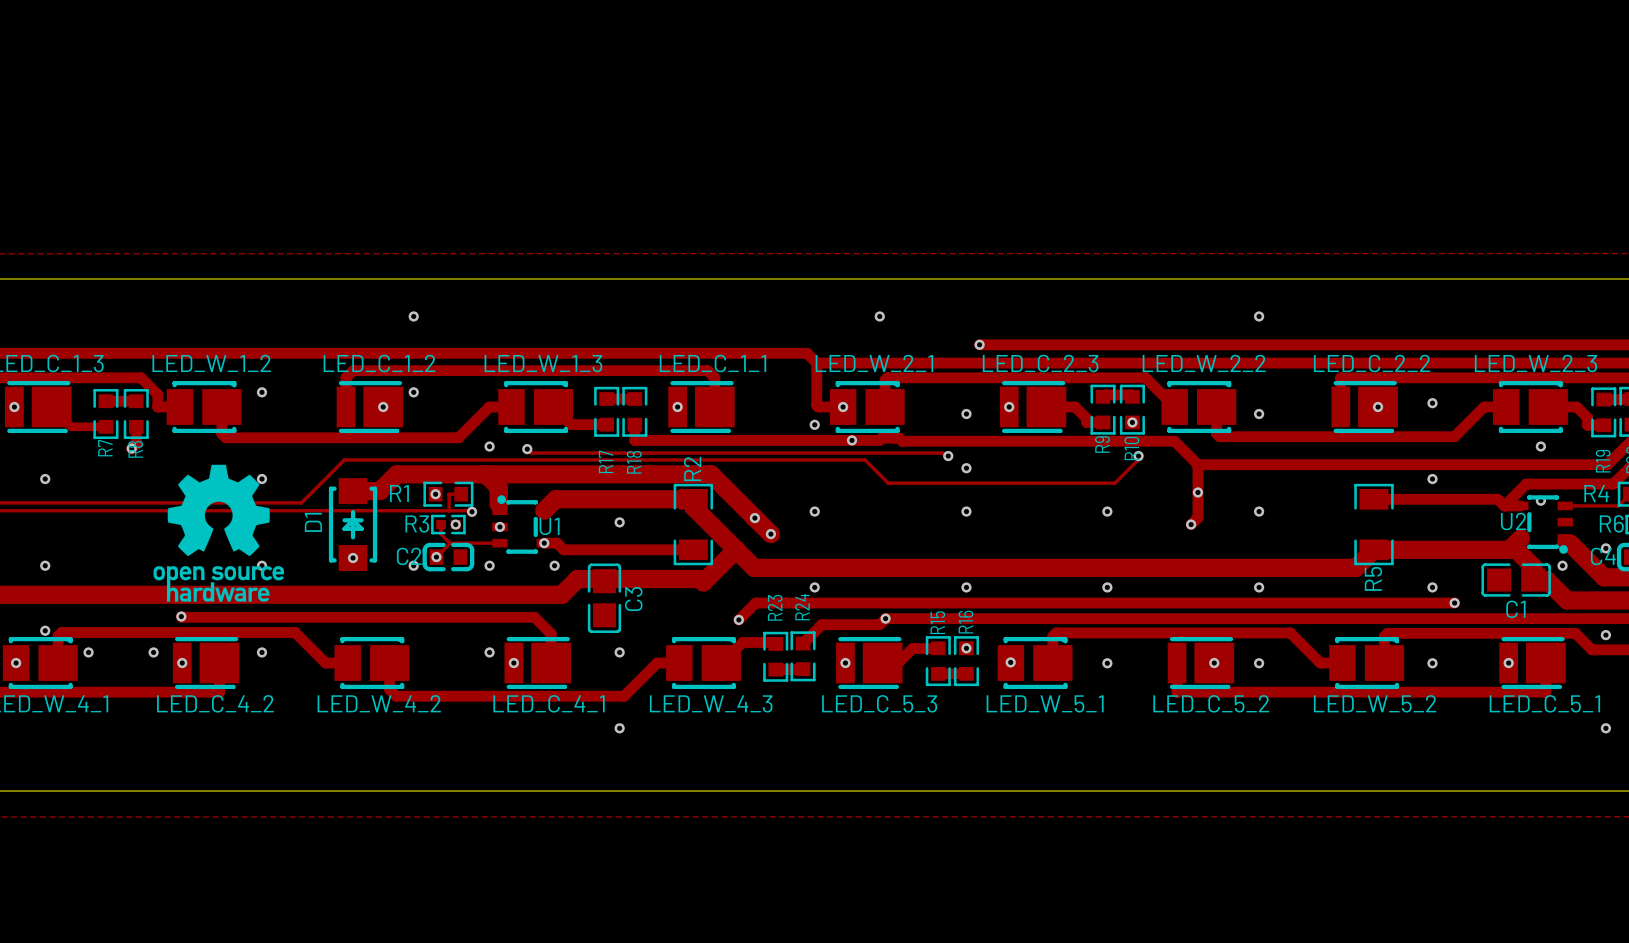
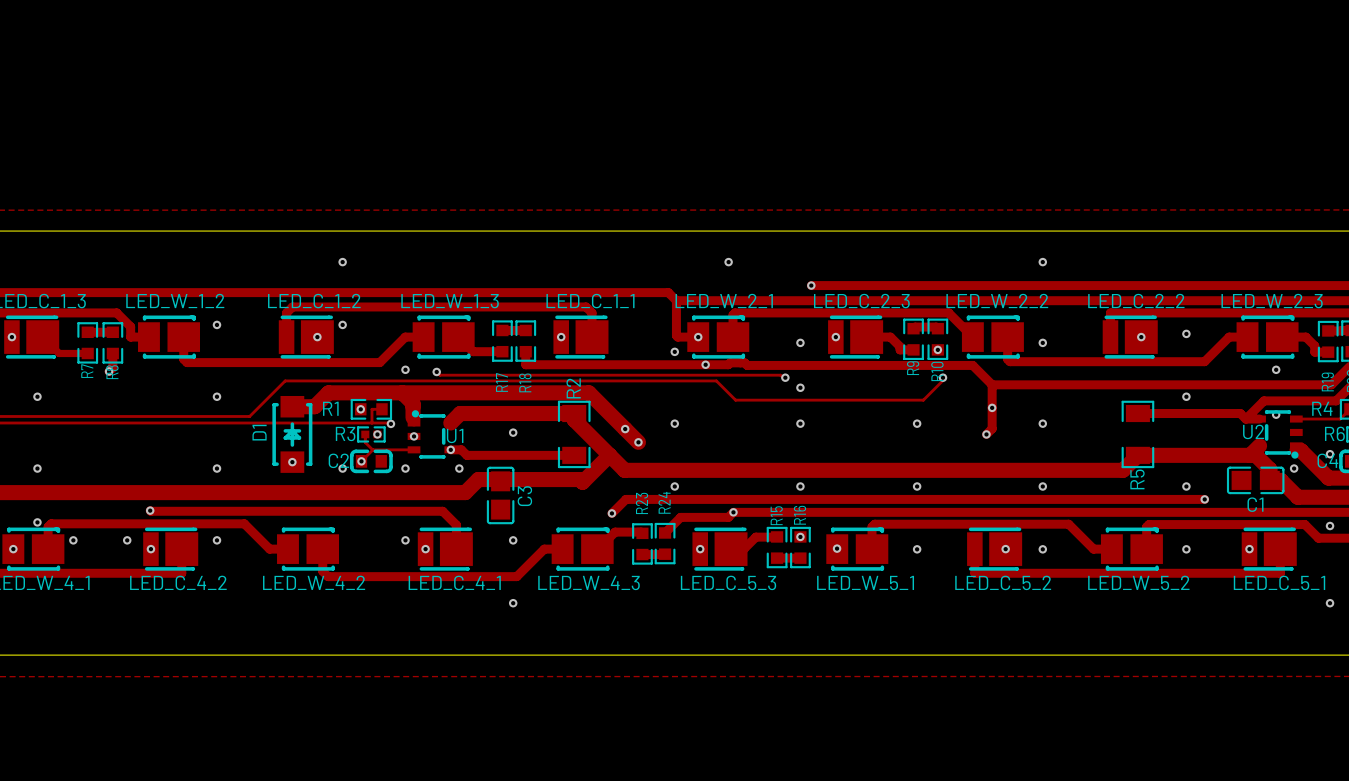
drawing: [153, 464, 285, 602] -> none

